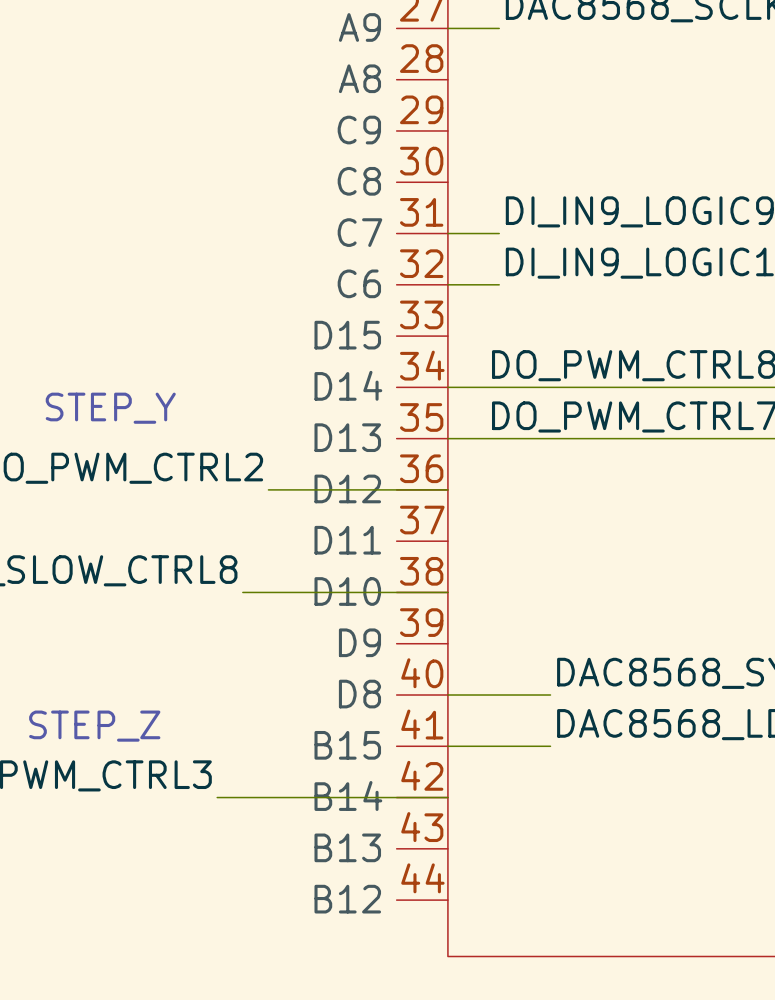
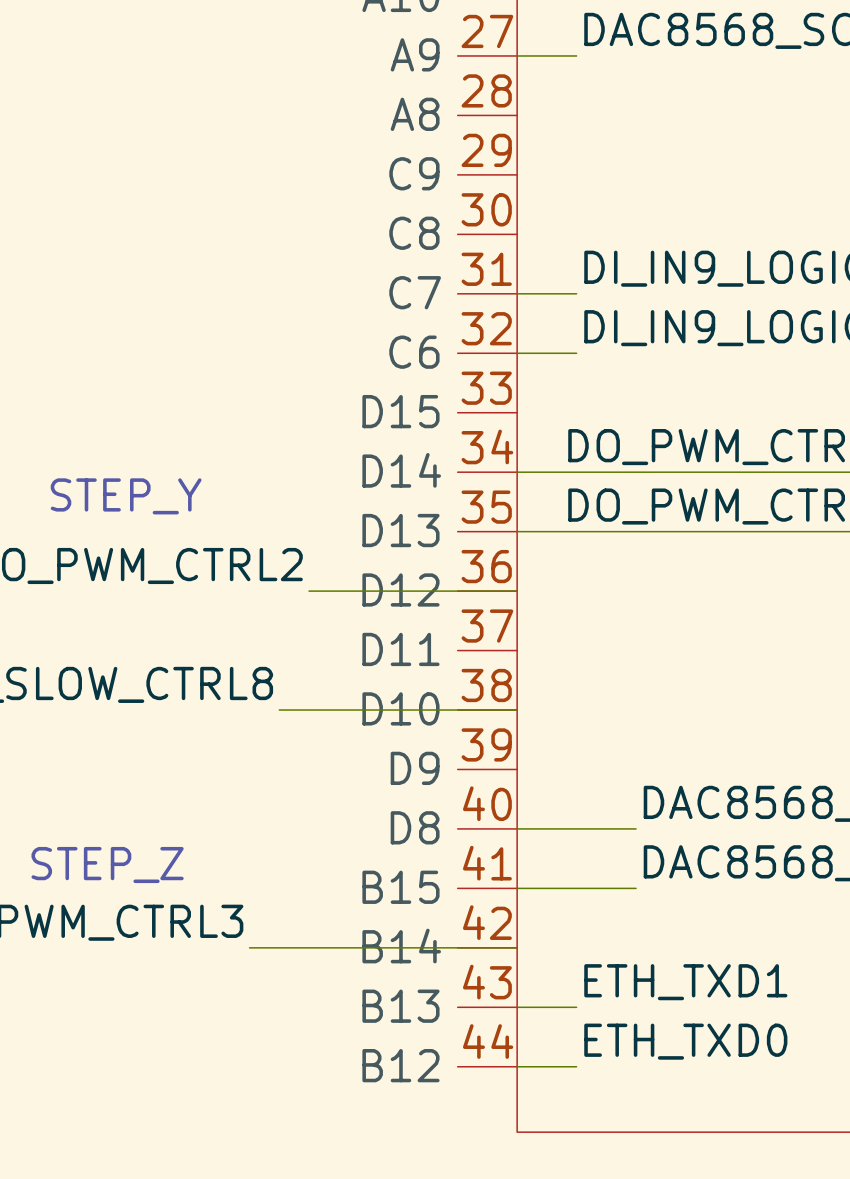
label: none -> ETH_TXD1 (685, 982)
wire: none -> (517, 1007) (576, 1007)
label: none -> ETH_TXD0 (685, 1041)
wire: none -> (517, 1066) (576, 1066)

